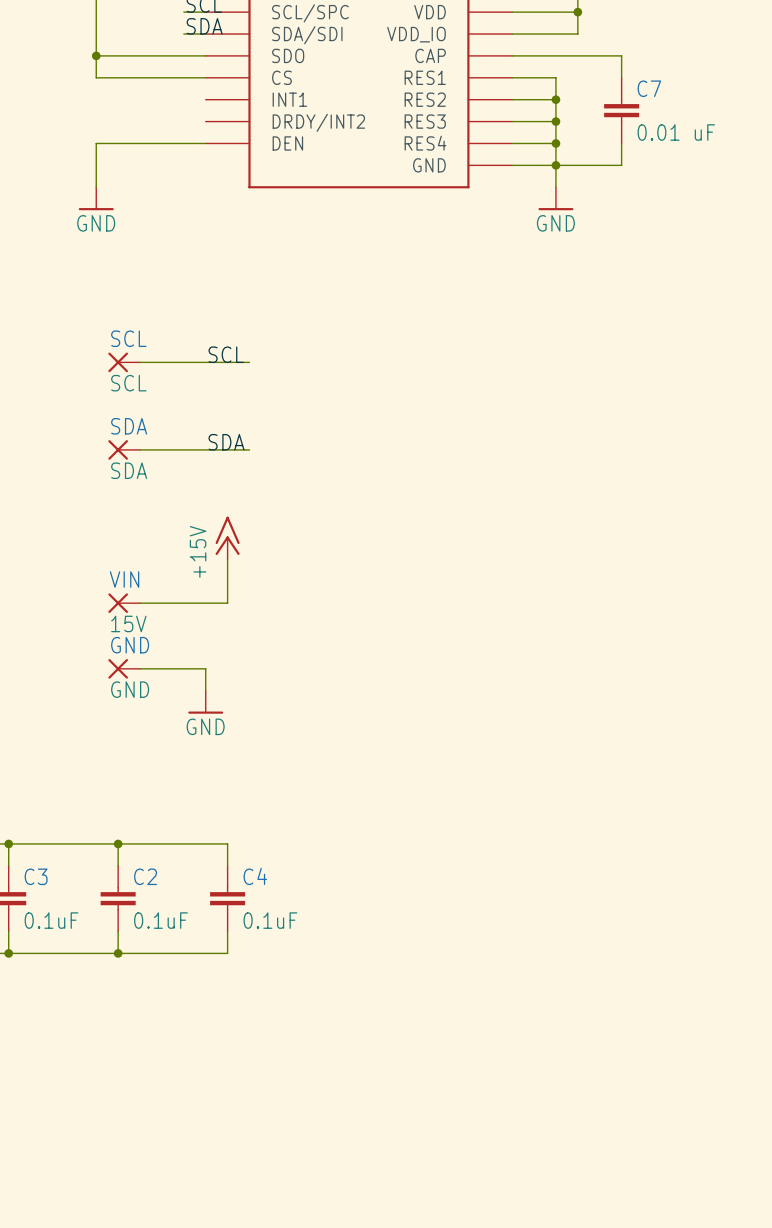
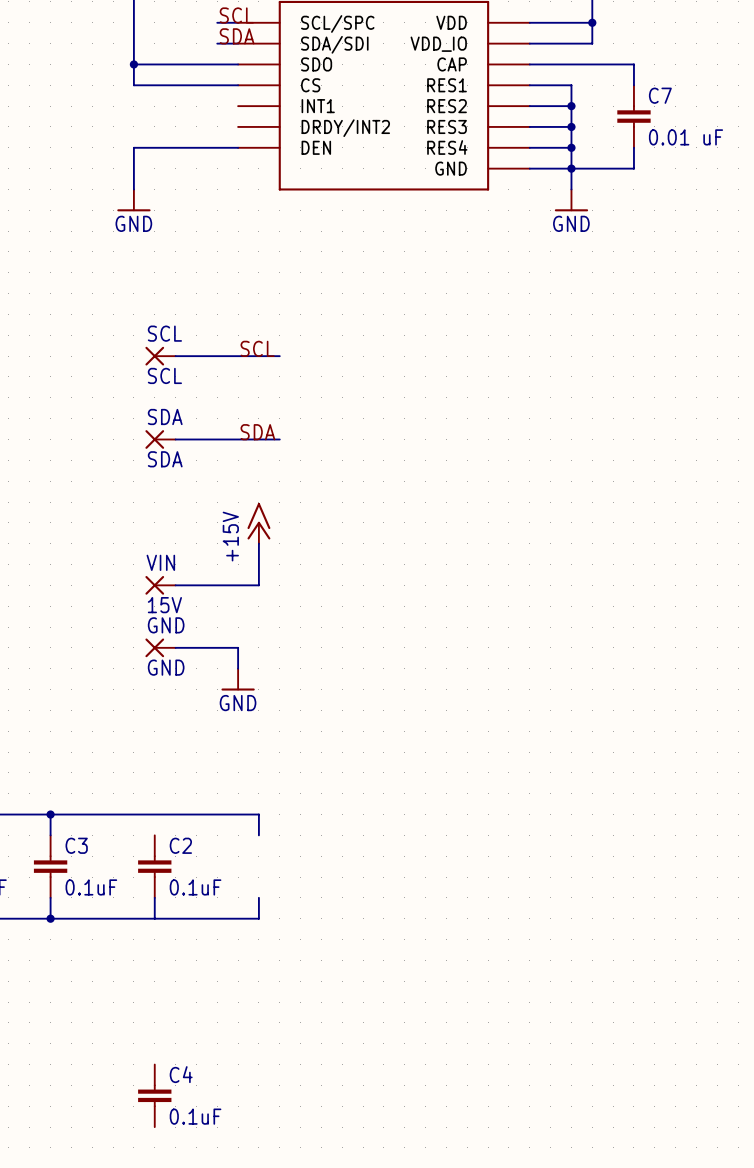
wire: (118, 843) (118, 865) -> none
junction: (118, 843) -> none
C4 position: (227, 898) -> (154, 1095)
junction: (118, 953) -> none

